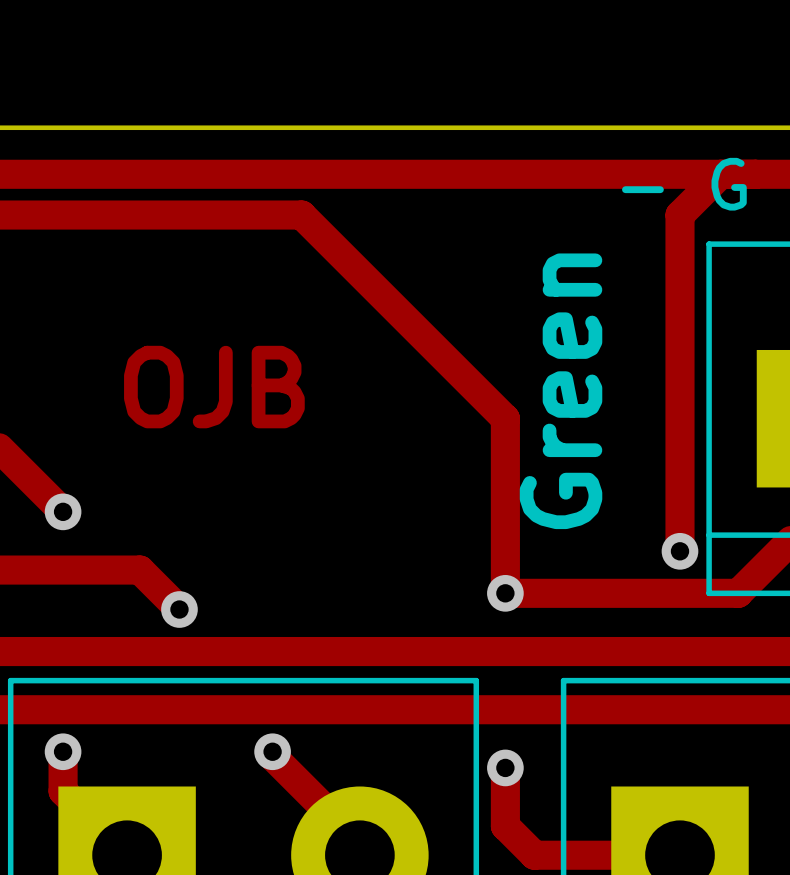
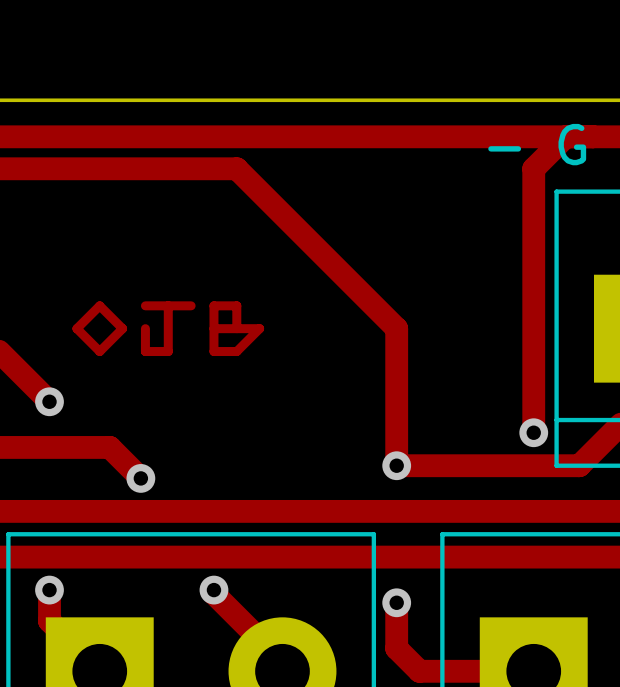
text: OJB (214, 387) -> none
track: none -> (99, 305) (76, 328) (99, 351) (122, 328) (99, 305)
track: none -> (145, 305) (191, 305)
track: none -> (168, 305) (168, 351) (145, 351) (145, 328)
text: Green (561, 391) -> none
track: none -> (213, 328) (259, 328) (236, 351) (213, 351) (213, 305) (236, 305) (236, 328)

